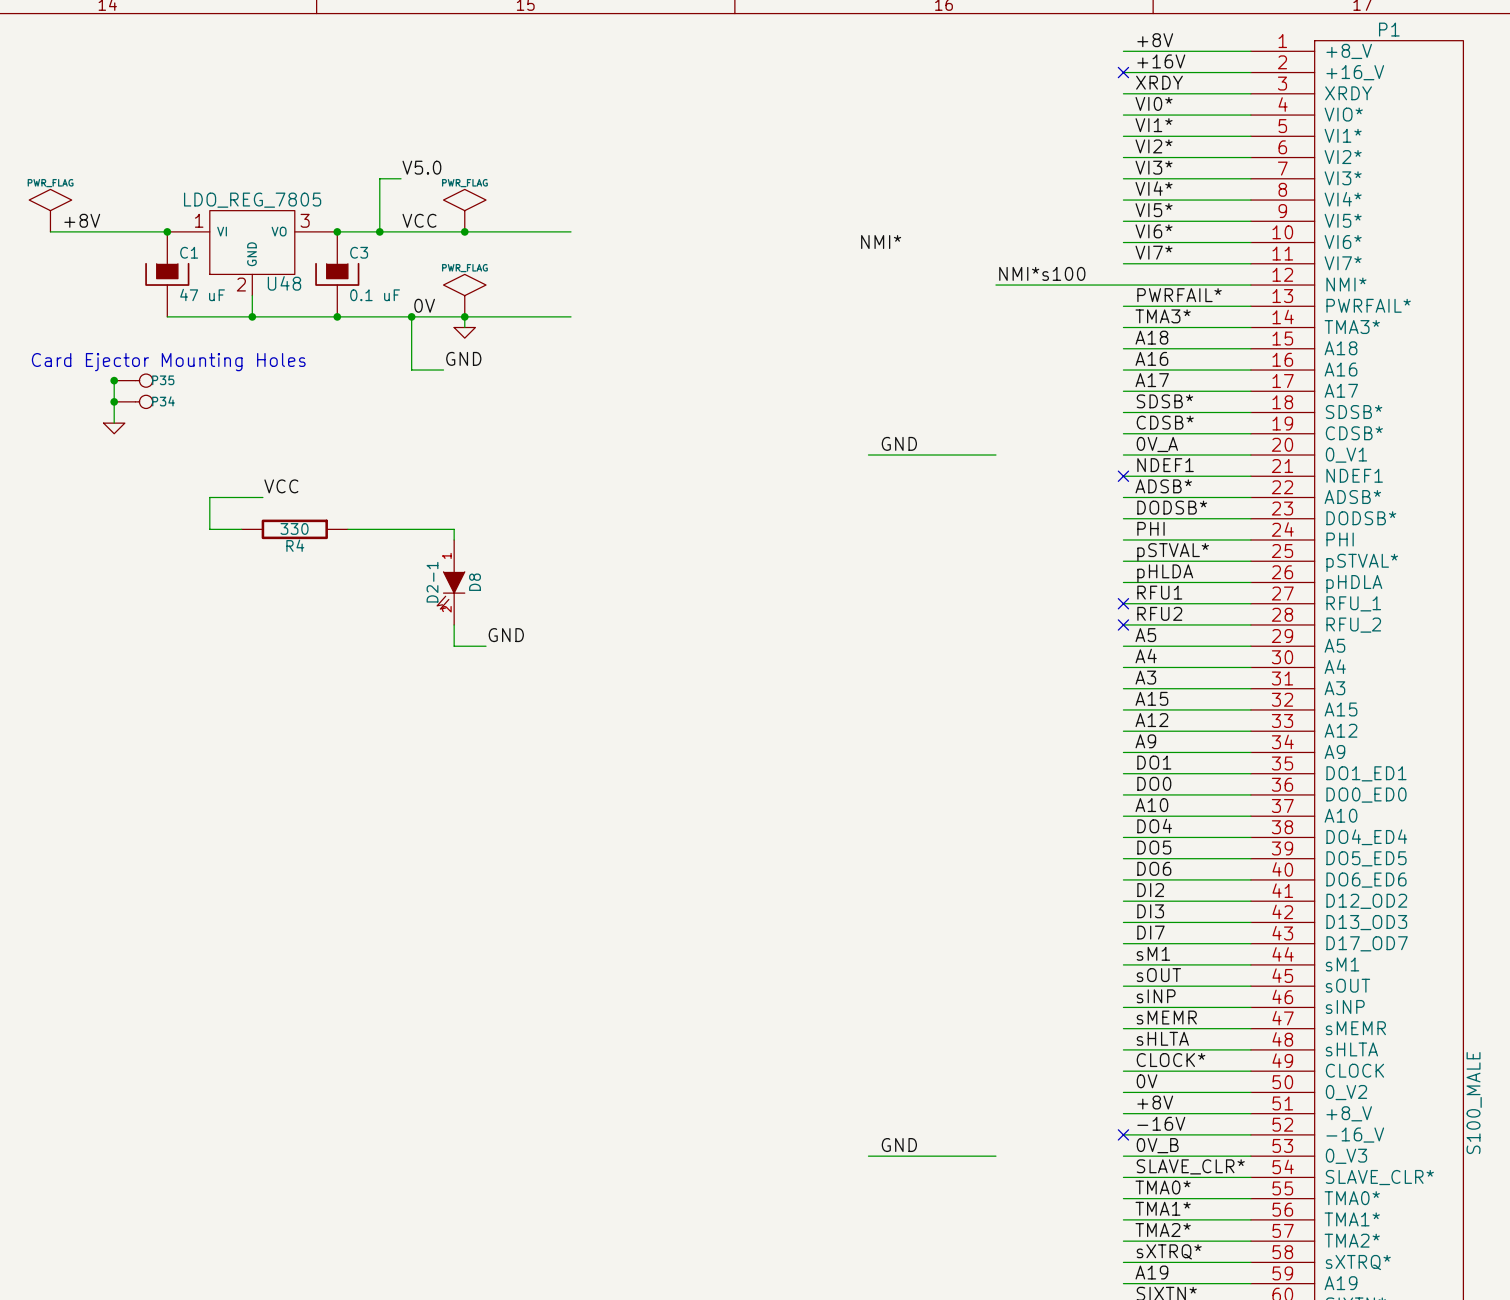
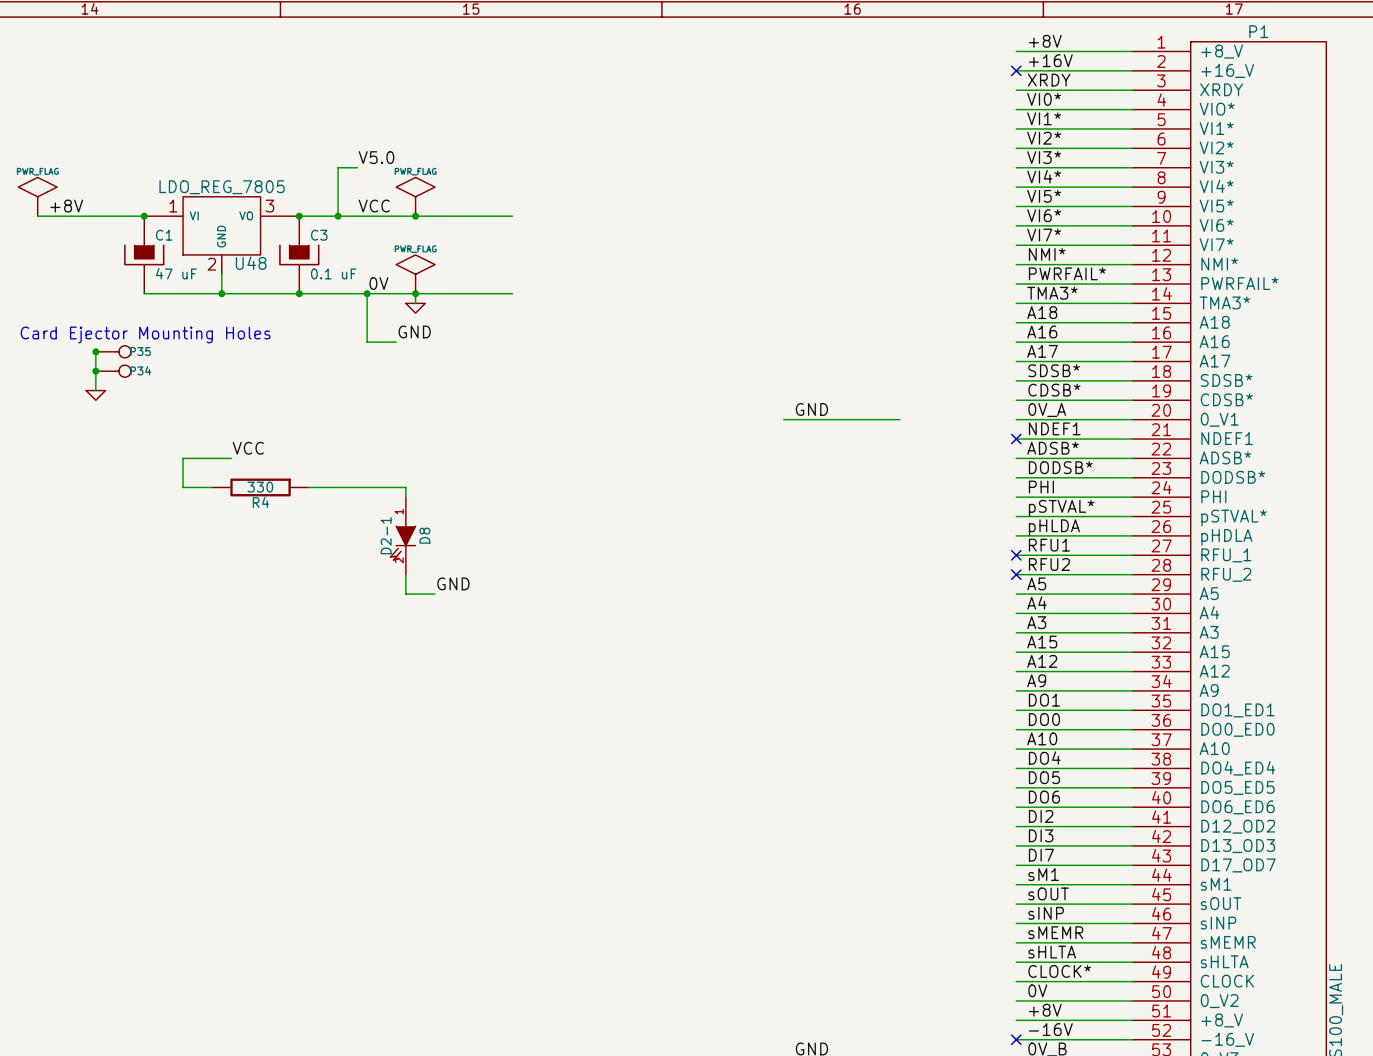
label: NMI* (881, 242) -> none
label: NMI*s100 (1042, 273) -> none
label: none -> NMI* (1047, 254)
wire: (995, 285) (1123, 285) -> none

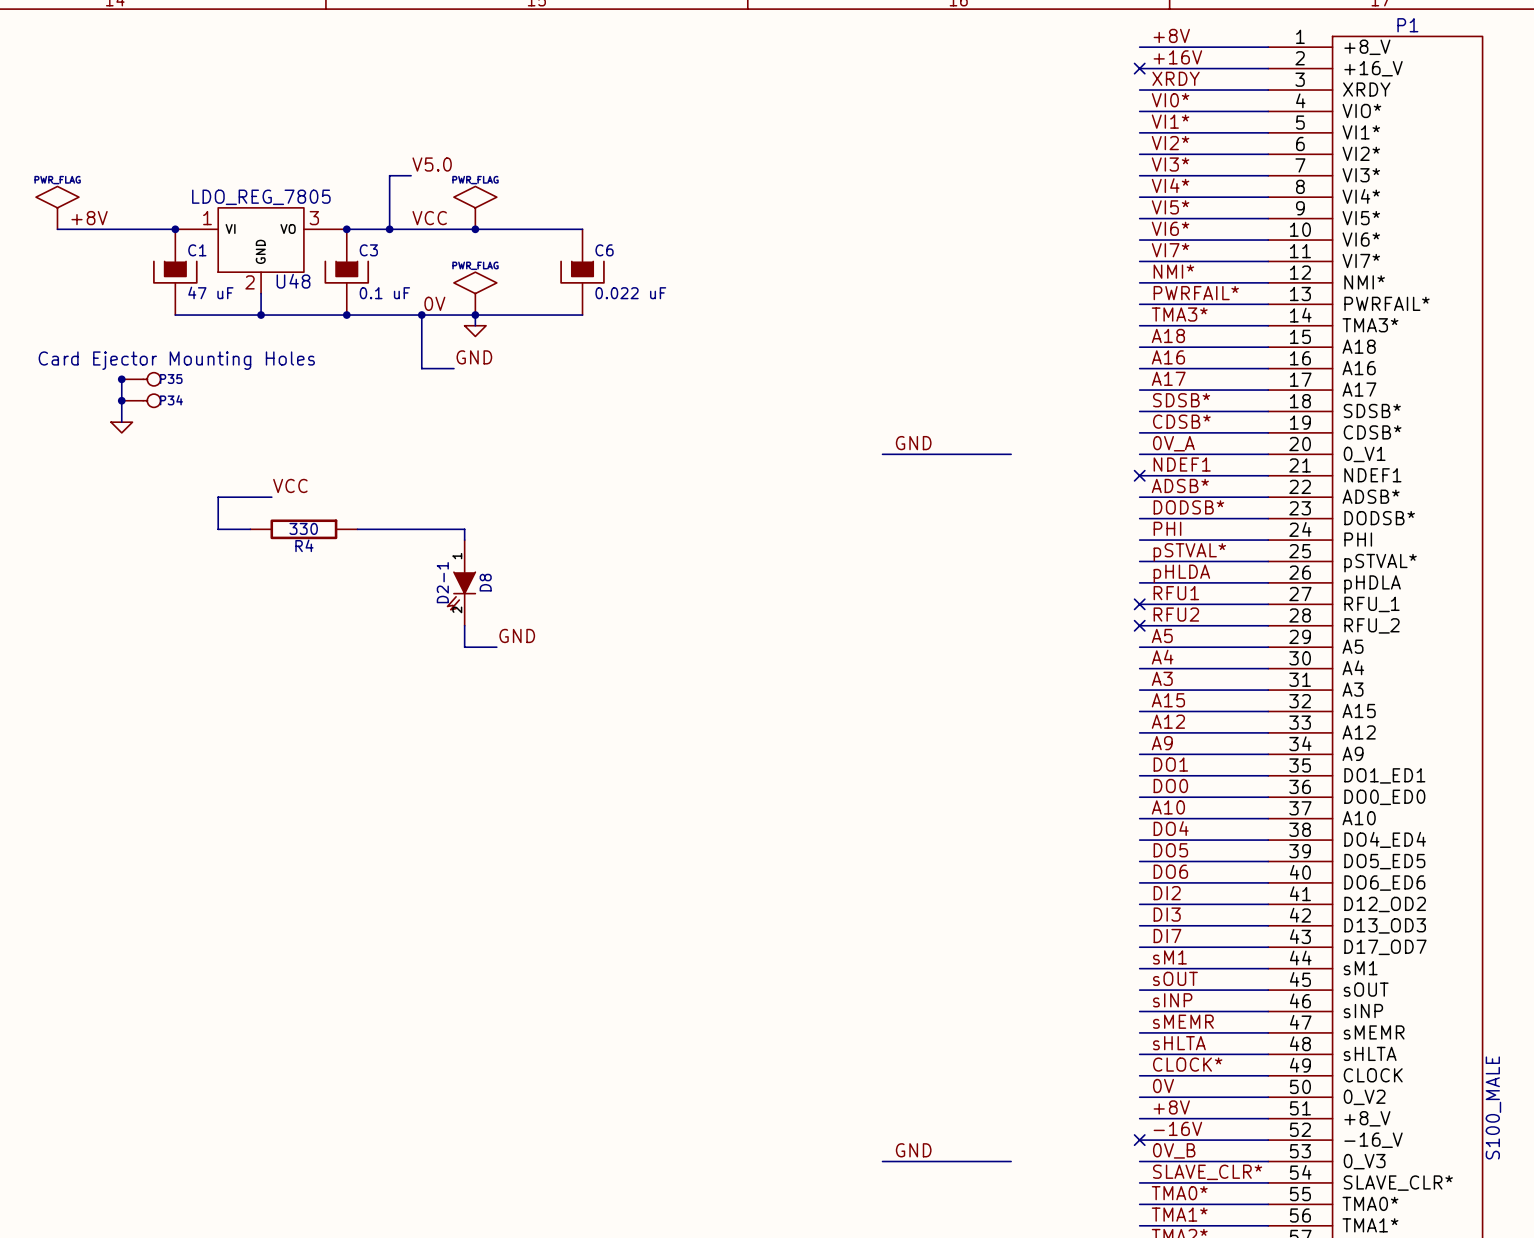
C6: none -> 0.022 uF (582, 272)

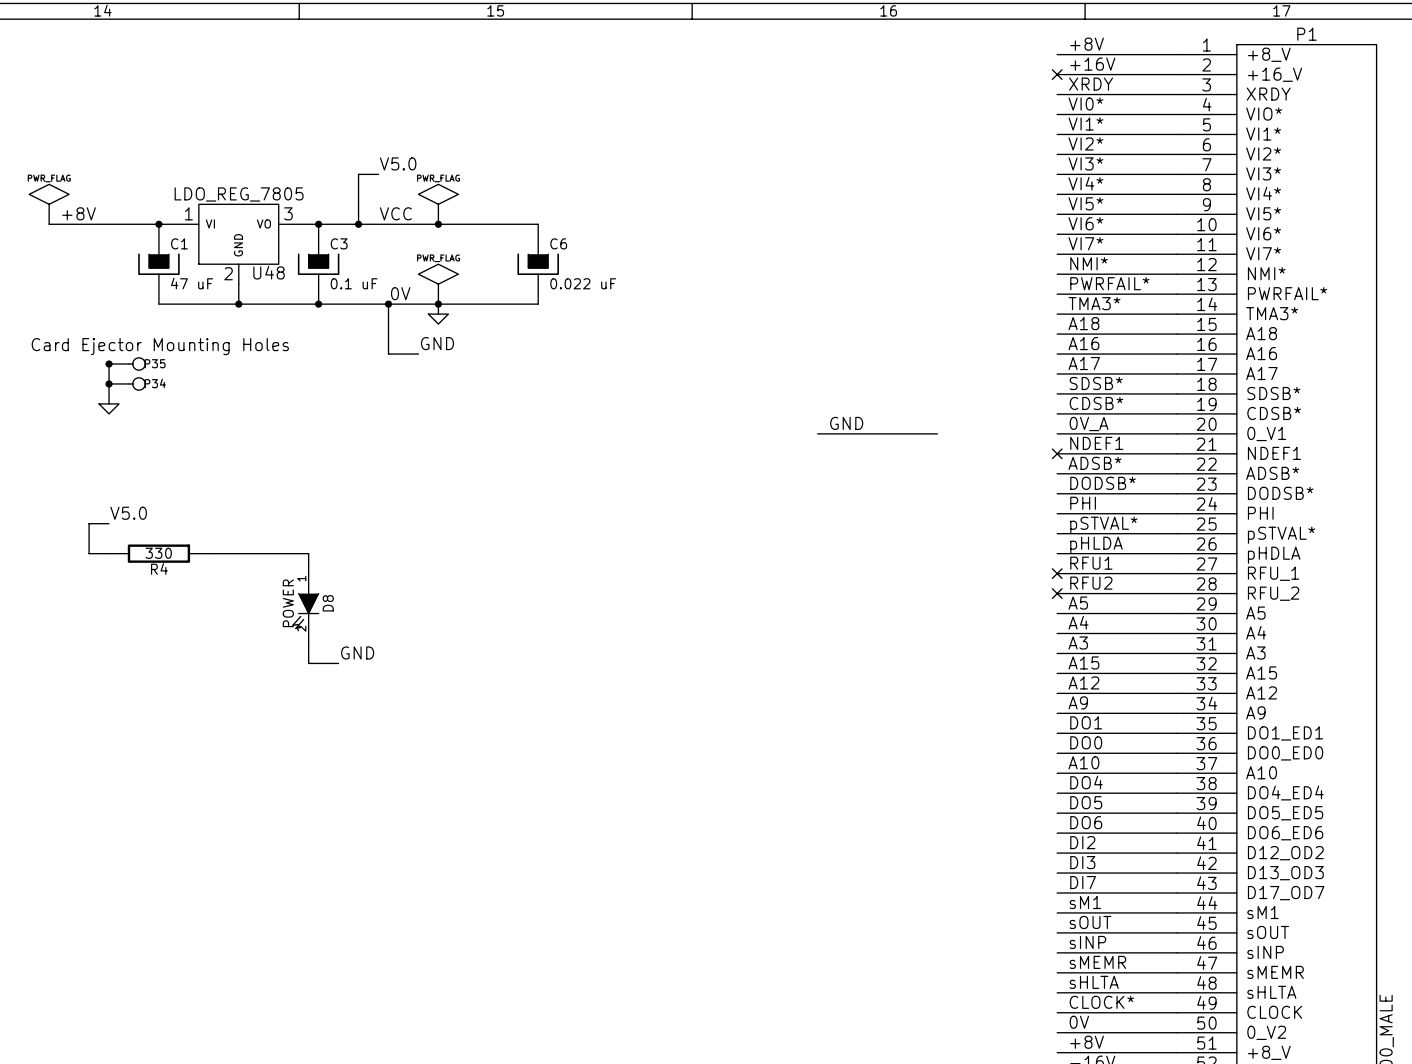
label: VCC (290, 485) -> none
wire: (271, 497) (218, 497) (218, 529) (250, 529) -> none
R4 position: (303, 529) -> (158, 553)
wire: (357, 529) (464, 529) (464, 540) -> (208, 553) (308, 553) (308, 563)
label: none -> V5.0 (128, 513)
wire: none -> (109, 523) (89, 523) (89, 553) (109, 553)
D8 value: D2-1 (442, 582) -> POWER (288, 603)
D8 position: (461, 582) -> (305, 603)
wire: (464, 625) (464, 647) (496, 647) -> (308, 643) (308, 663) (338, 663)
label position: GND (517, 635) -> GND (357, 652)

